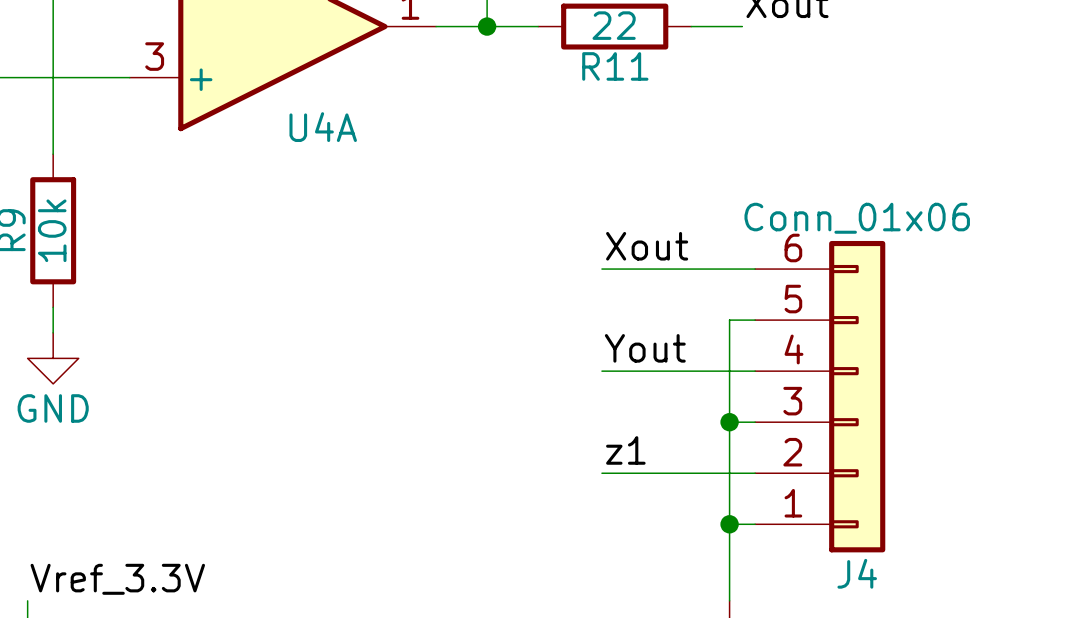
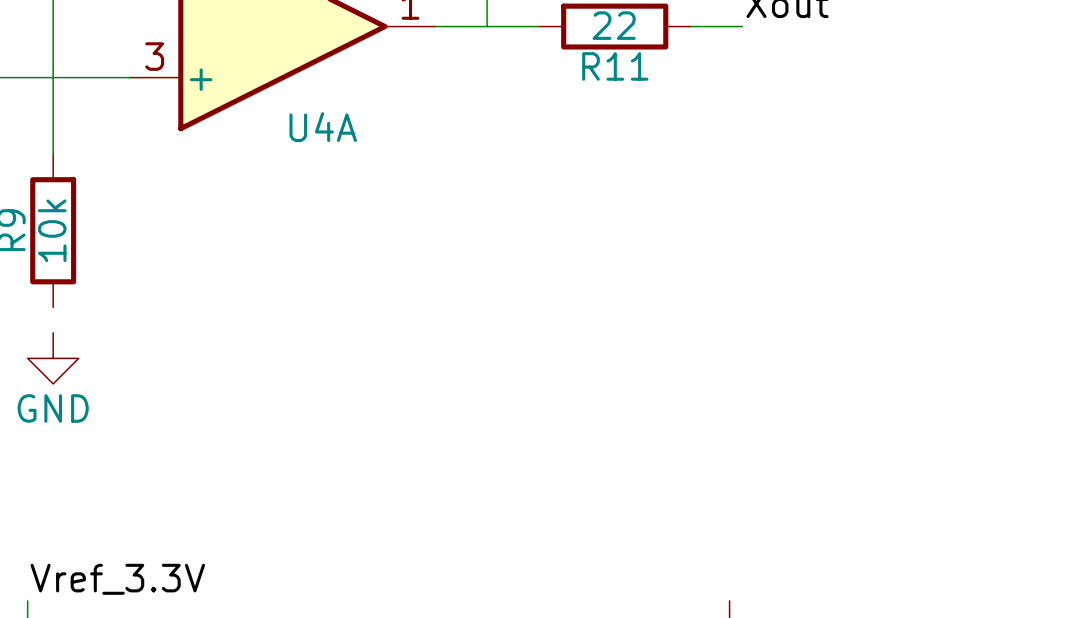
junction: (487, 26) -> none
label: Xout (647, 246) -> none
wire: (601, 269) (755, 269) -> none
wire: (53, 307) (53, 332) -> none
wire: (755, 320) (729, 320) (729, 600) -> none
label: Yout (645, 348) -> none
wire: (601, 371) (755, 371) -> none
J4: Conn_01x06 (820, 396) -> none
wire: (729, 422) (755, 422) -> none
junction: (729, 422) -> none
label: z1 (625, 450) -> none
wire: (601, 473) (755, 473) -> none
wire: (729, 524) (755, 524) -> none
junction: (729, 524) -> none

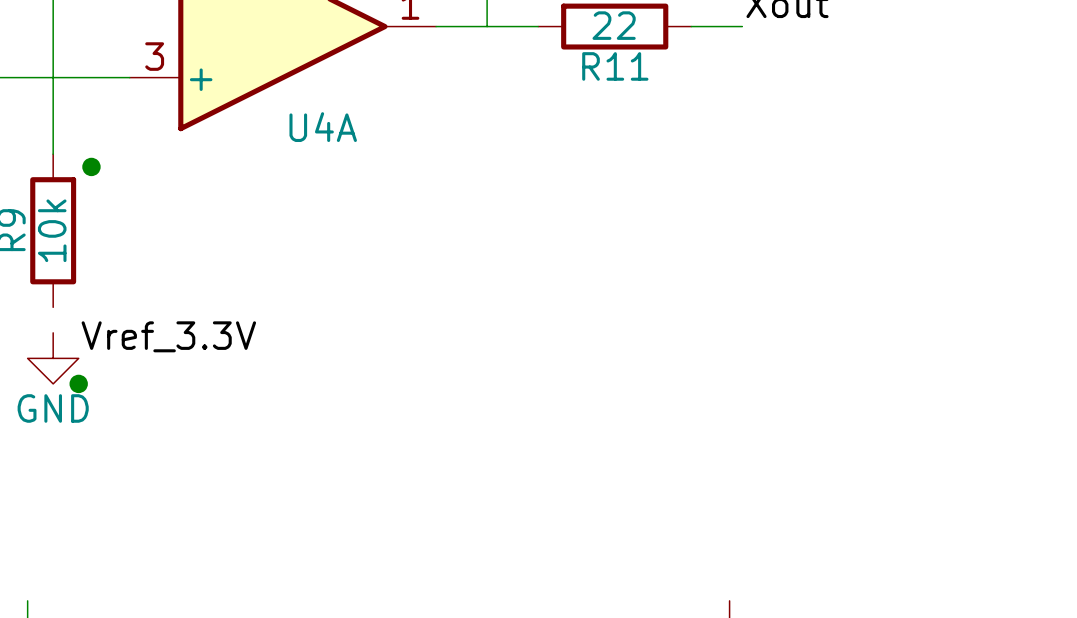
junction: none -> (91, 166)
junction: none -> (78, 383)
label position: Vref_3.3V (117, 579) -> Vref_3.3V (168, 336)

